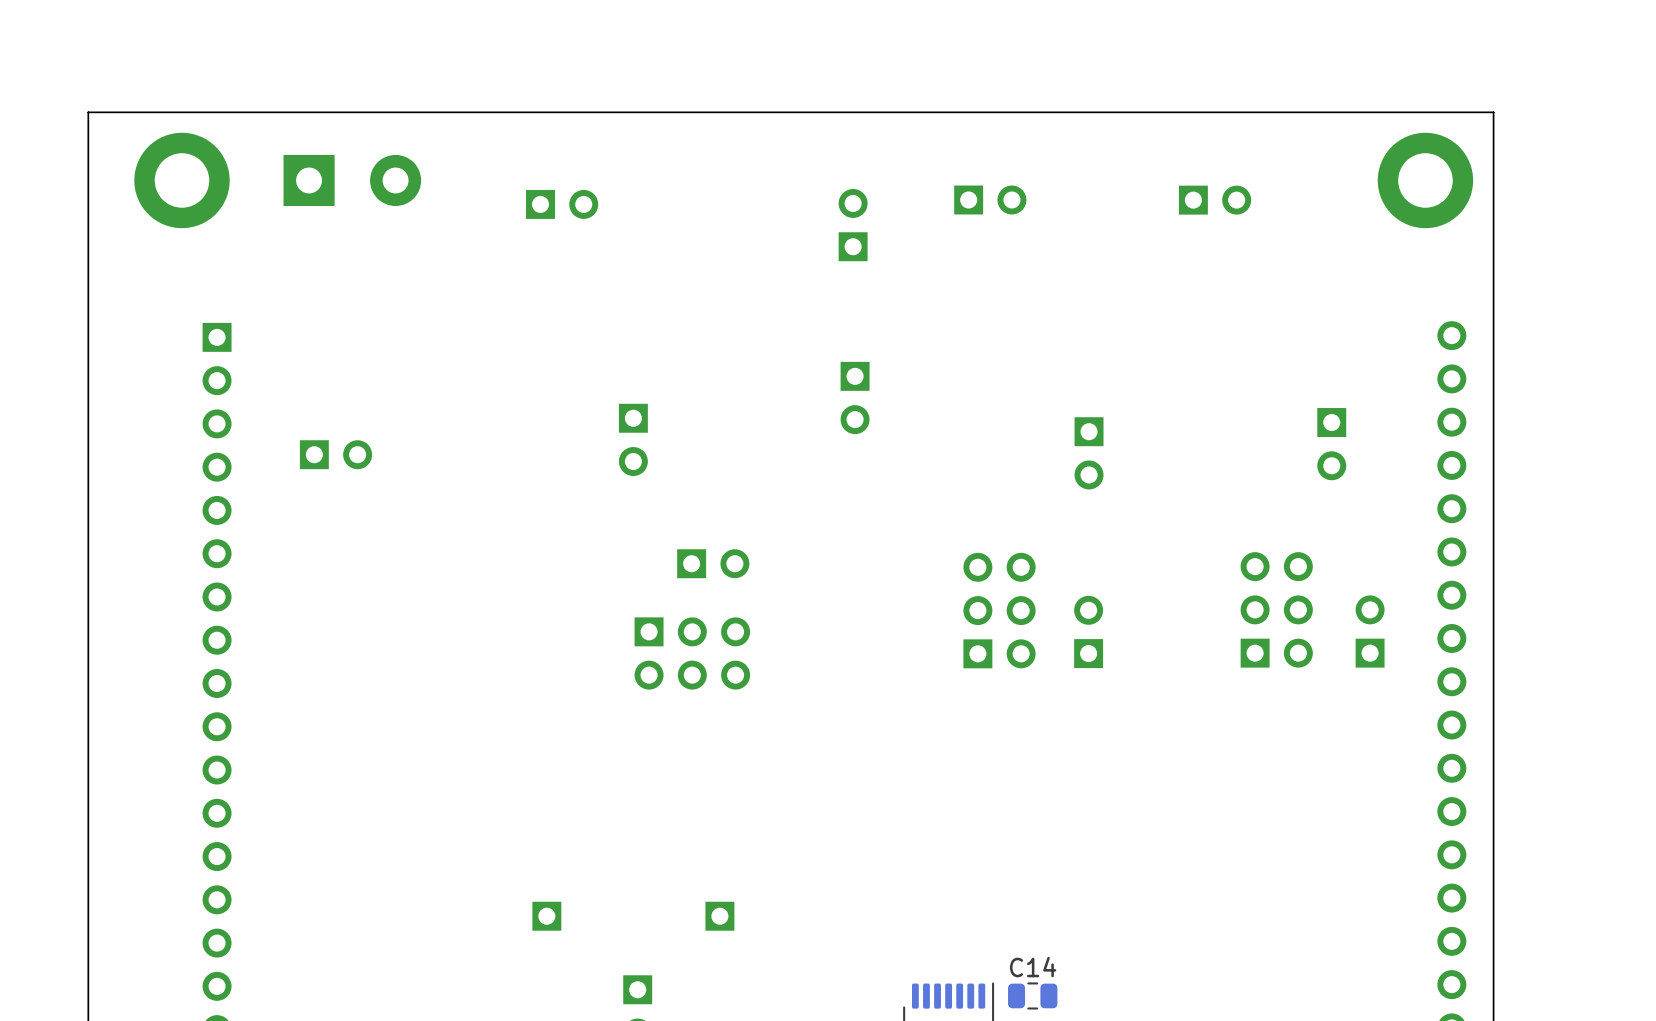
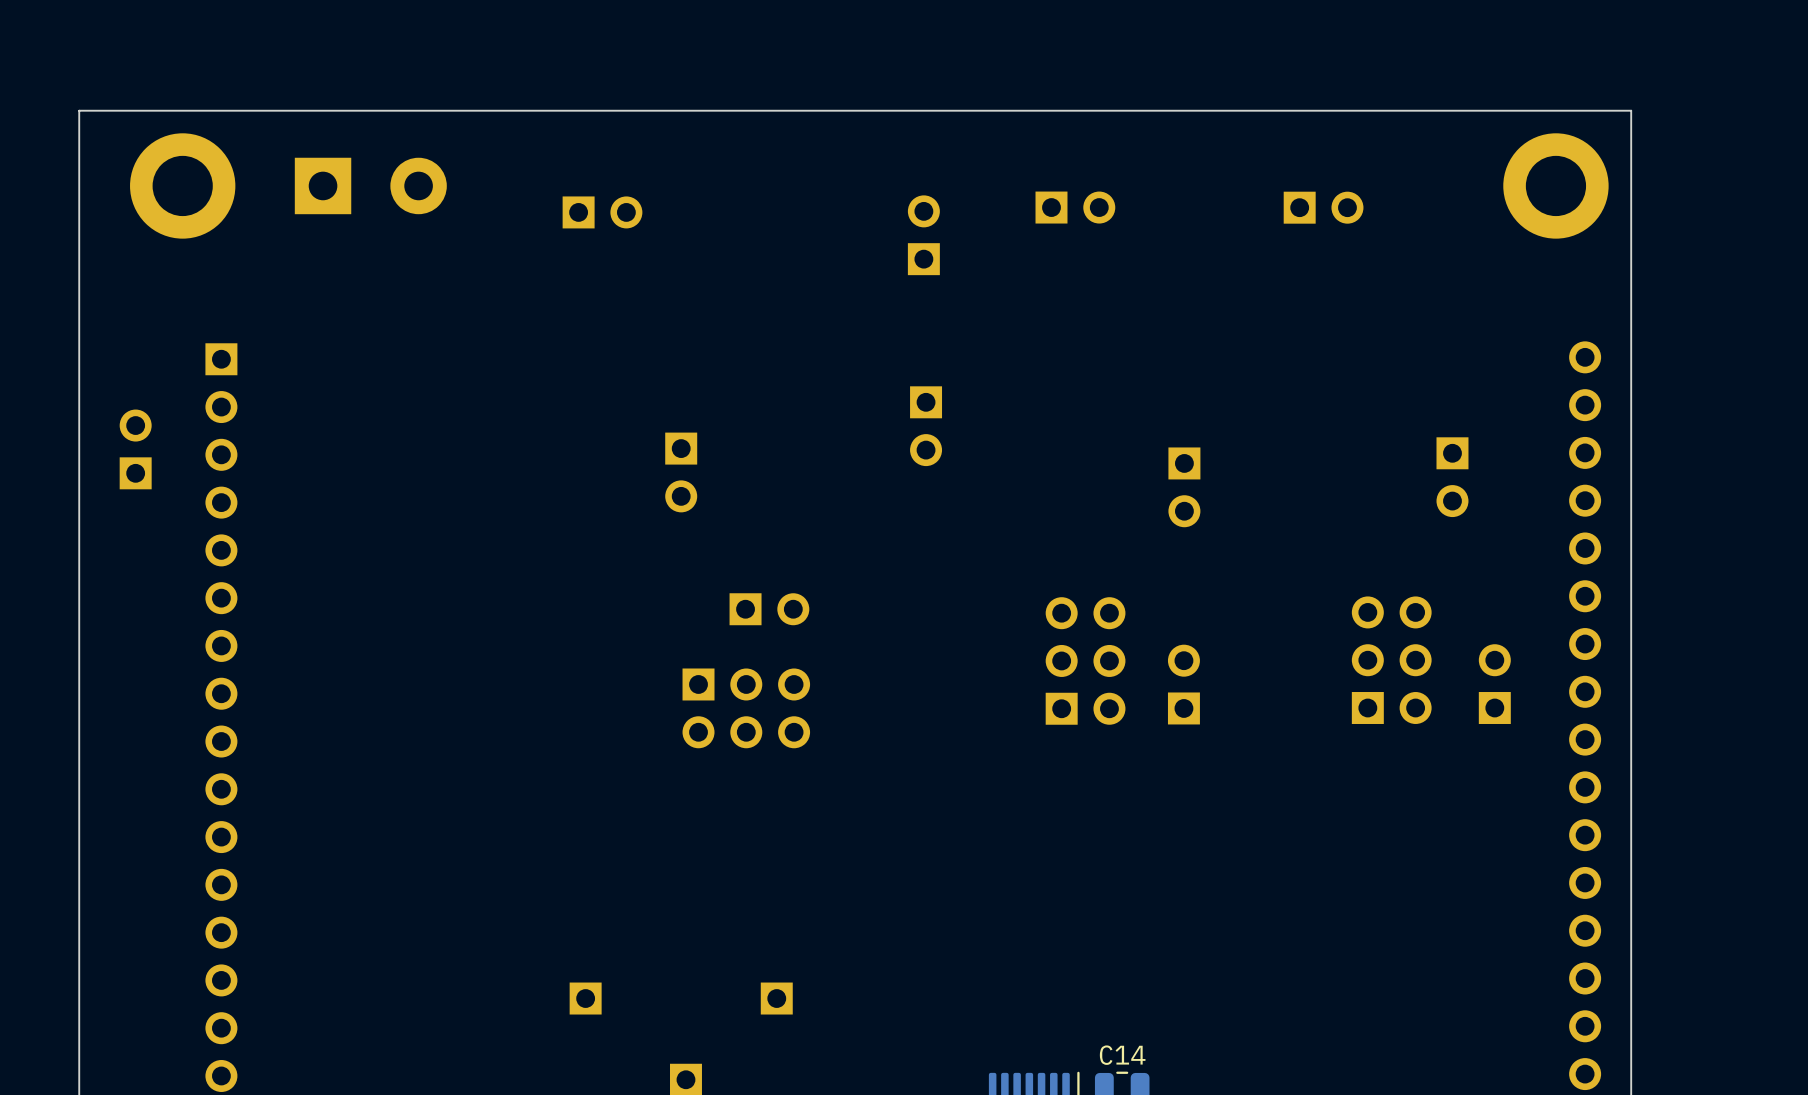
part rotation: 0° (335, 454) -> 90° counterclockwise (135, 449)
part position: (335, 454) -> (135, 449)

